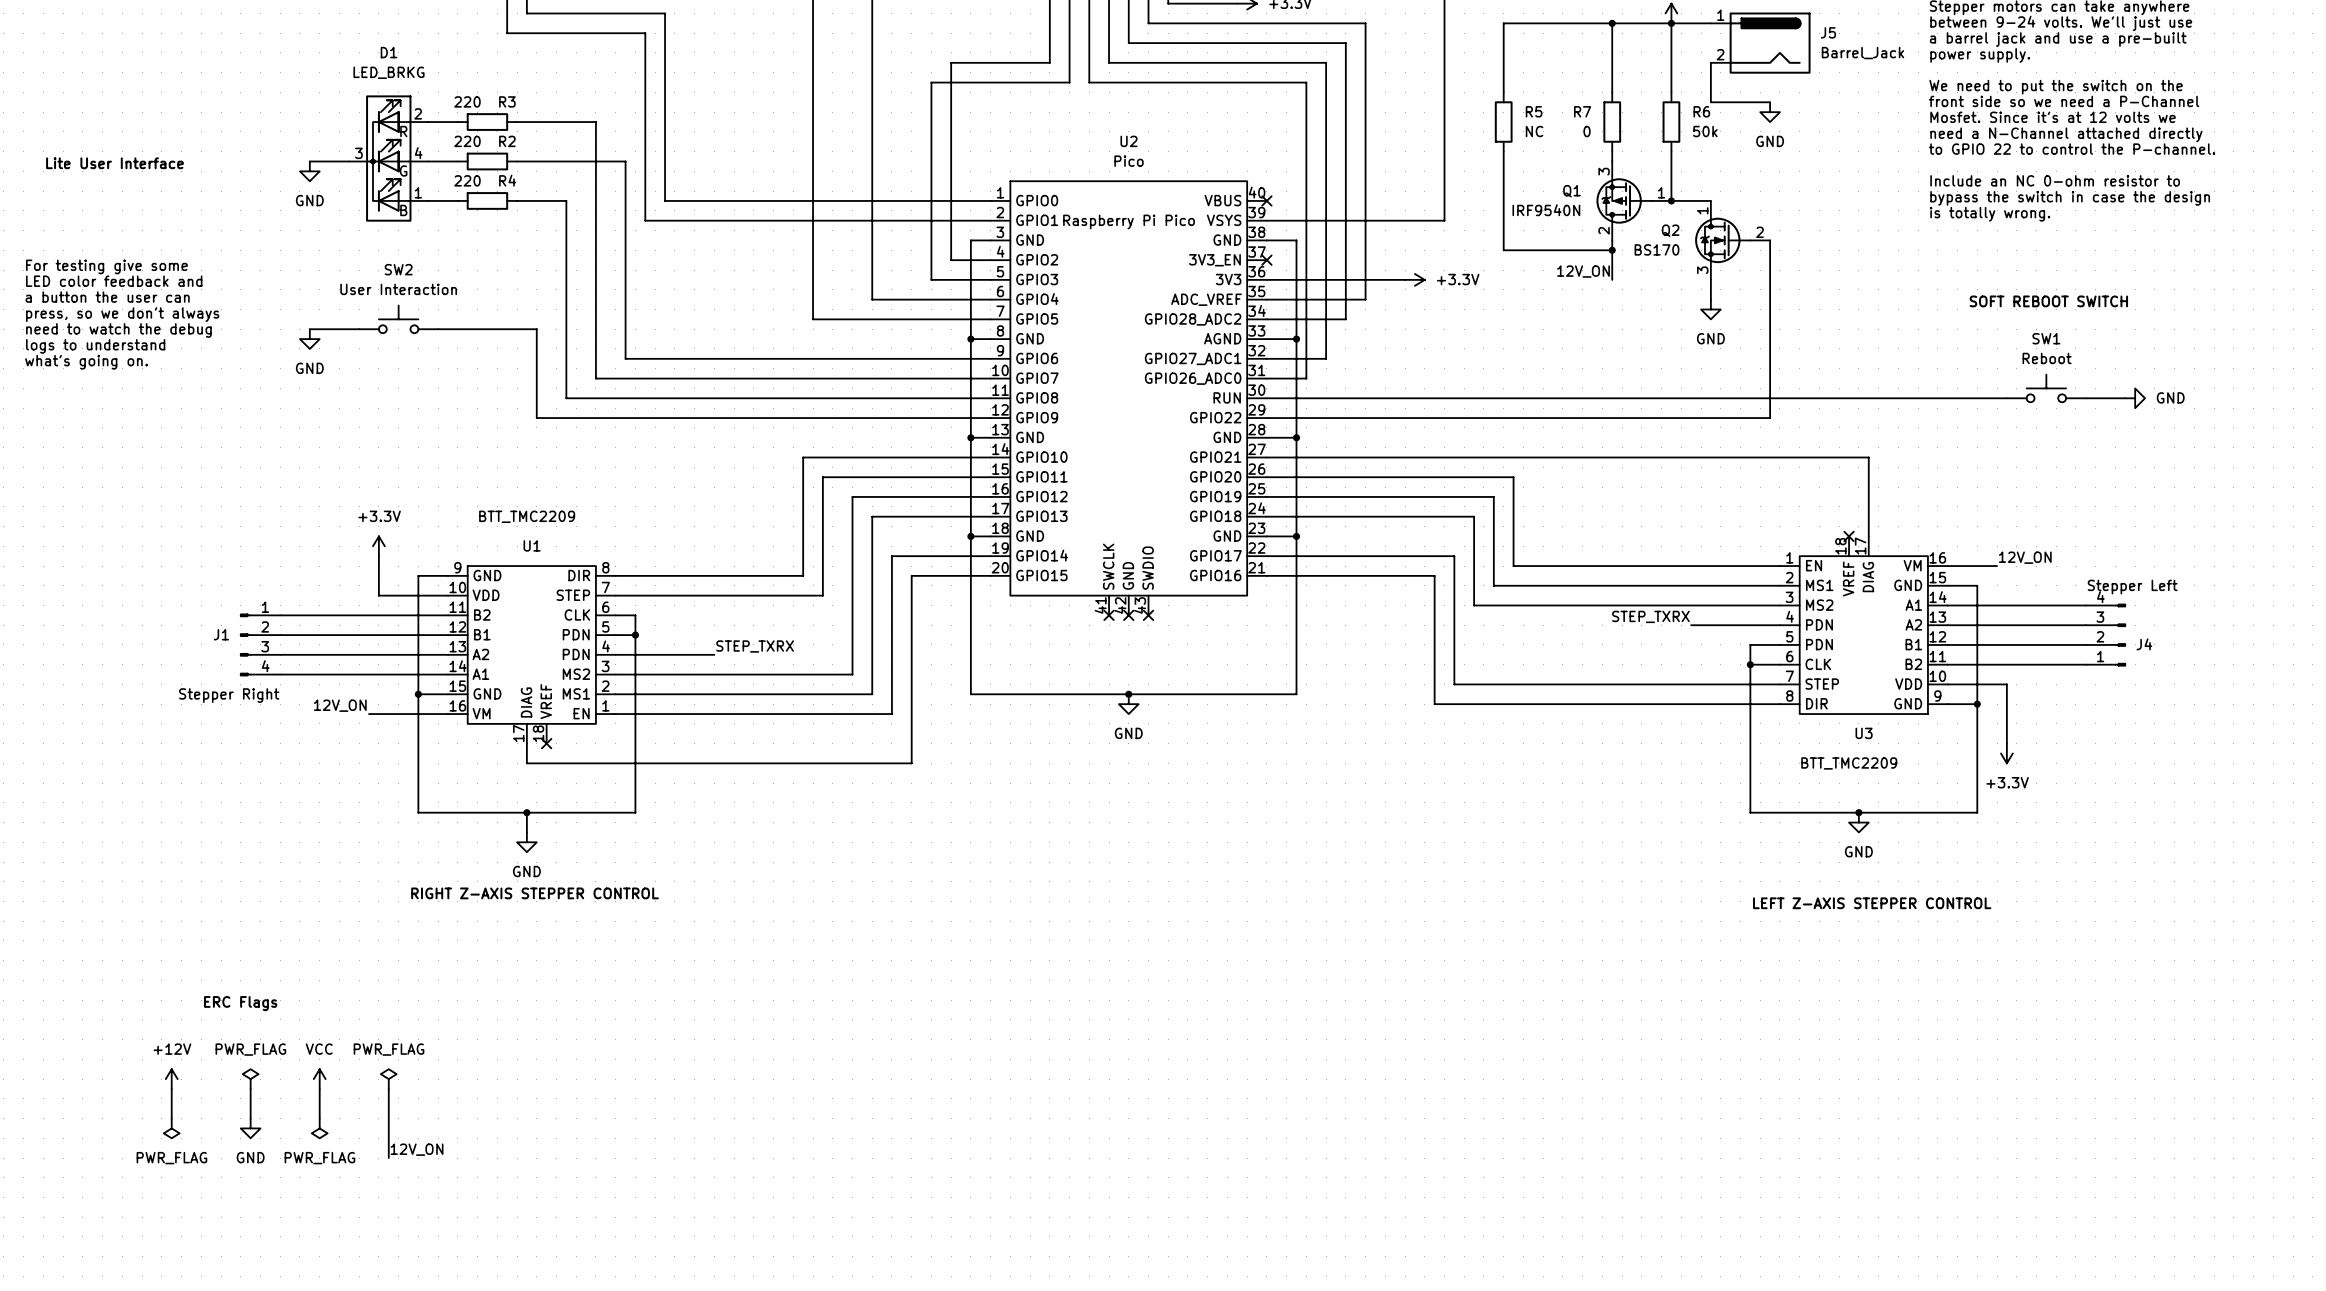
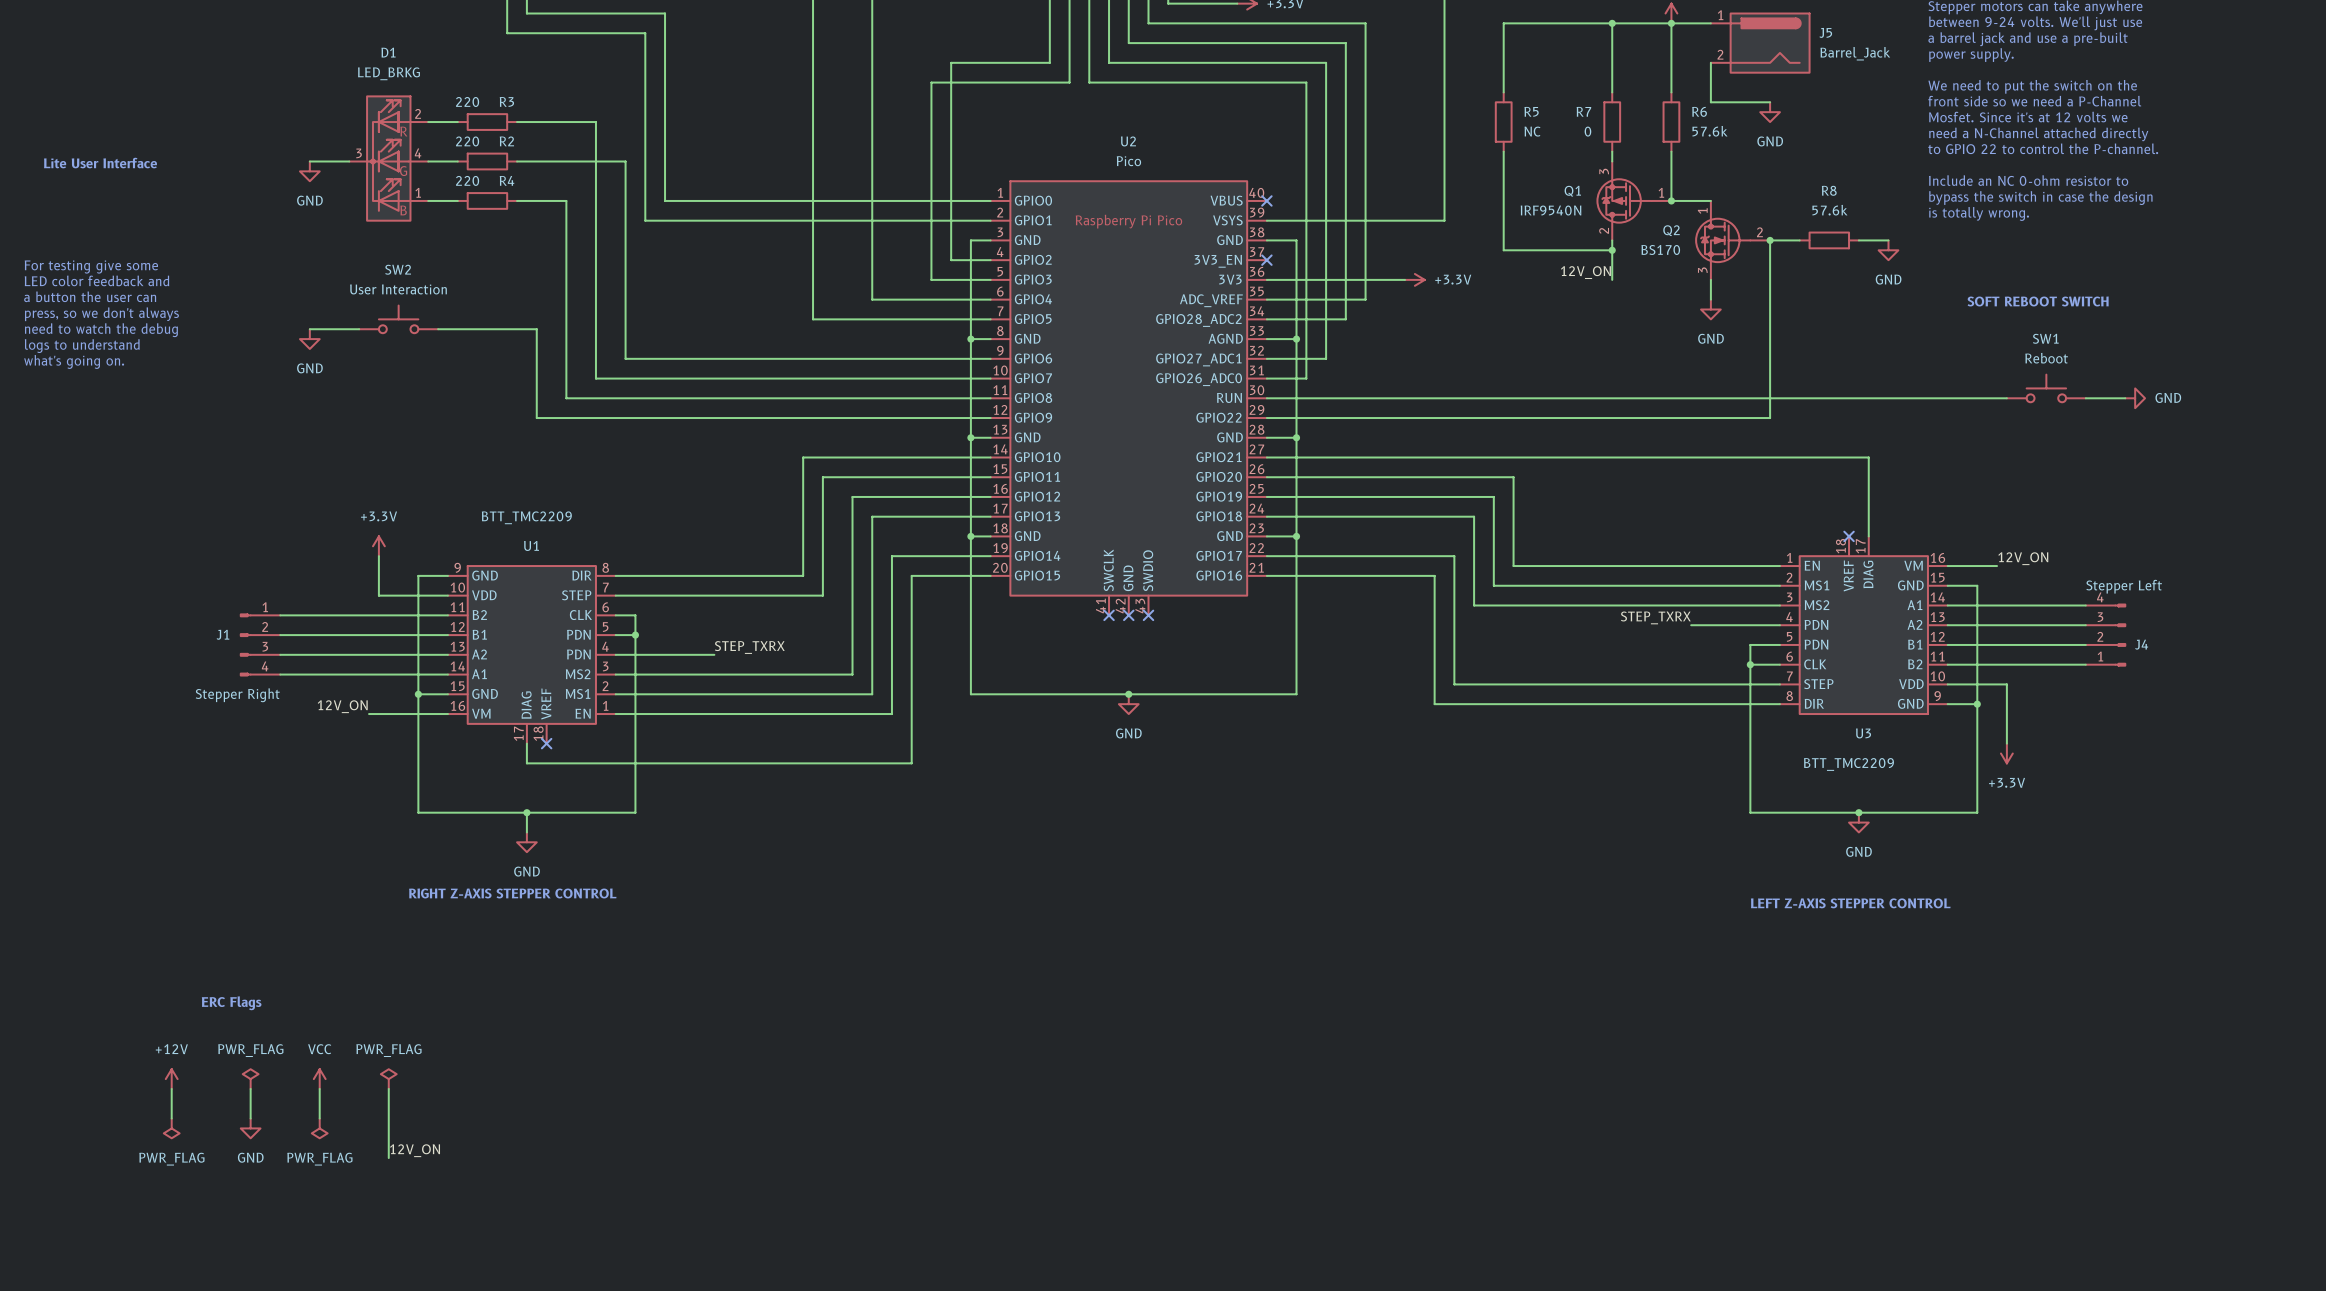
R6 value: 50k (1705, 131) -> 57.6k (1709, 131)
wire: none -> (1770, 240) (1799, 240)
junction: none -> (1770, 240)
R8: none -> 57.6k (1829, 240)
wire: none -> (1858, 240) (1888, 240)
power symbol: none -> GND (1888, 250)

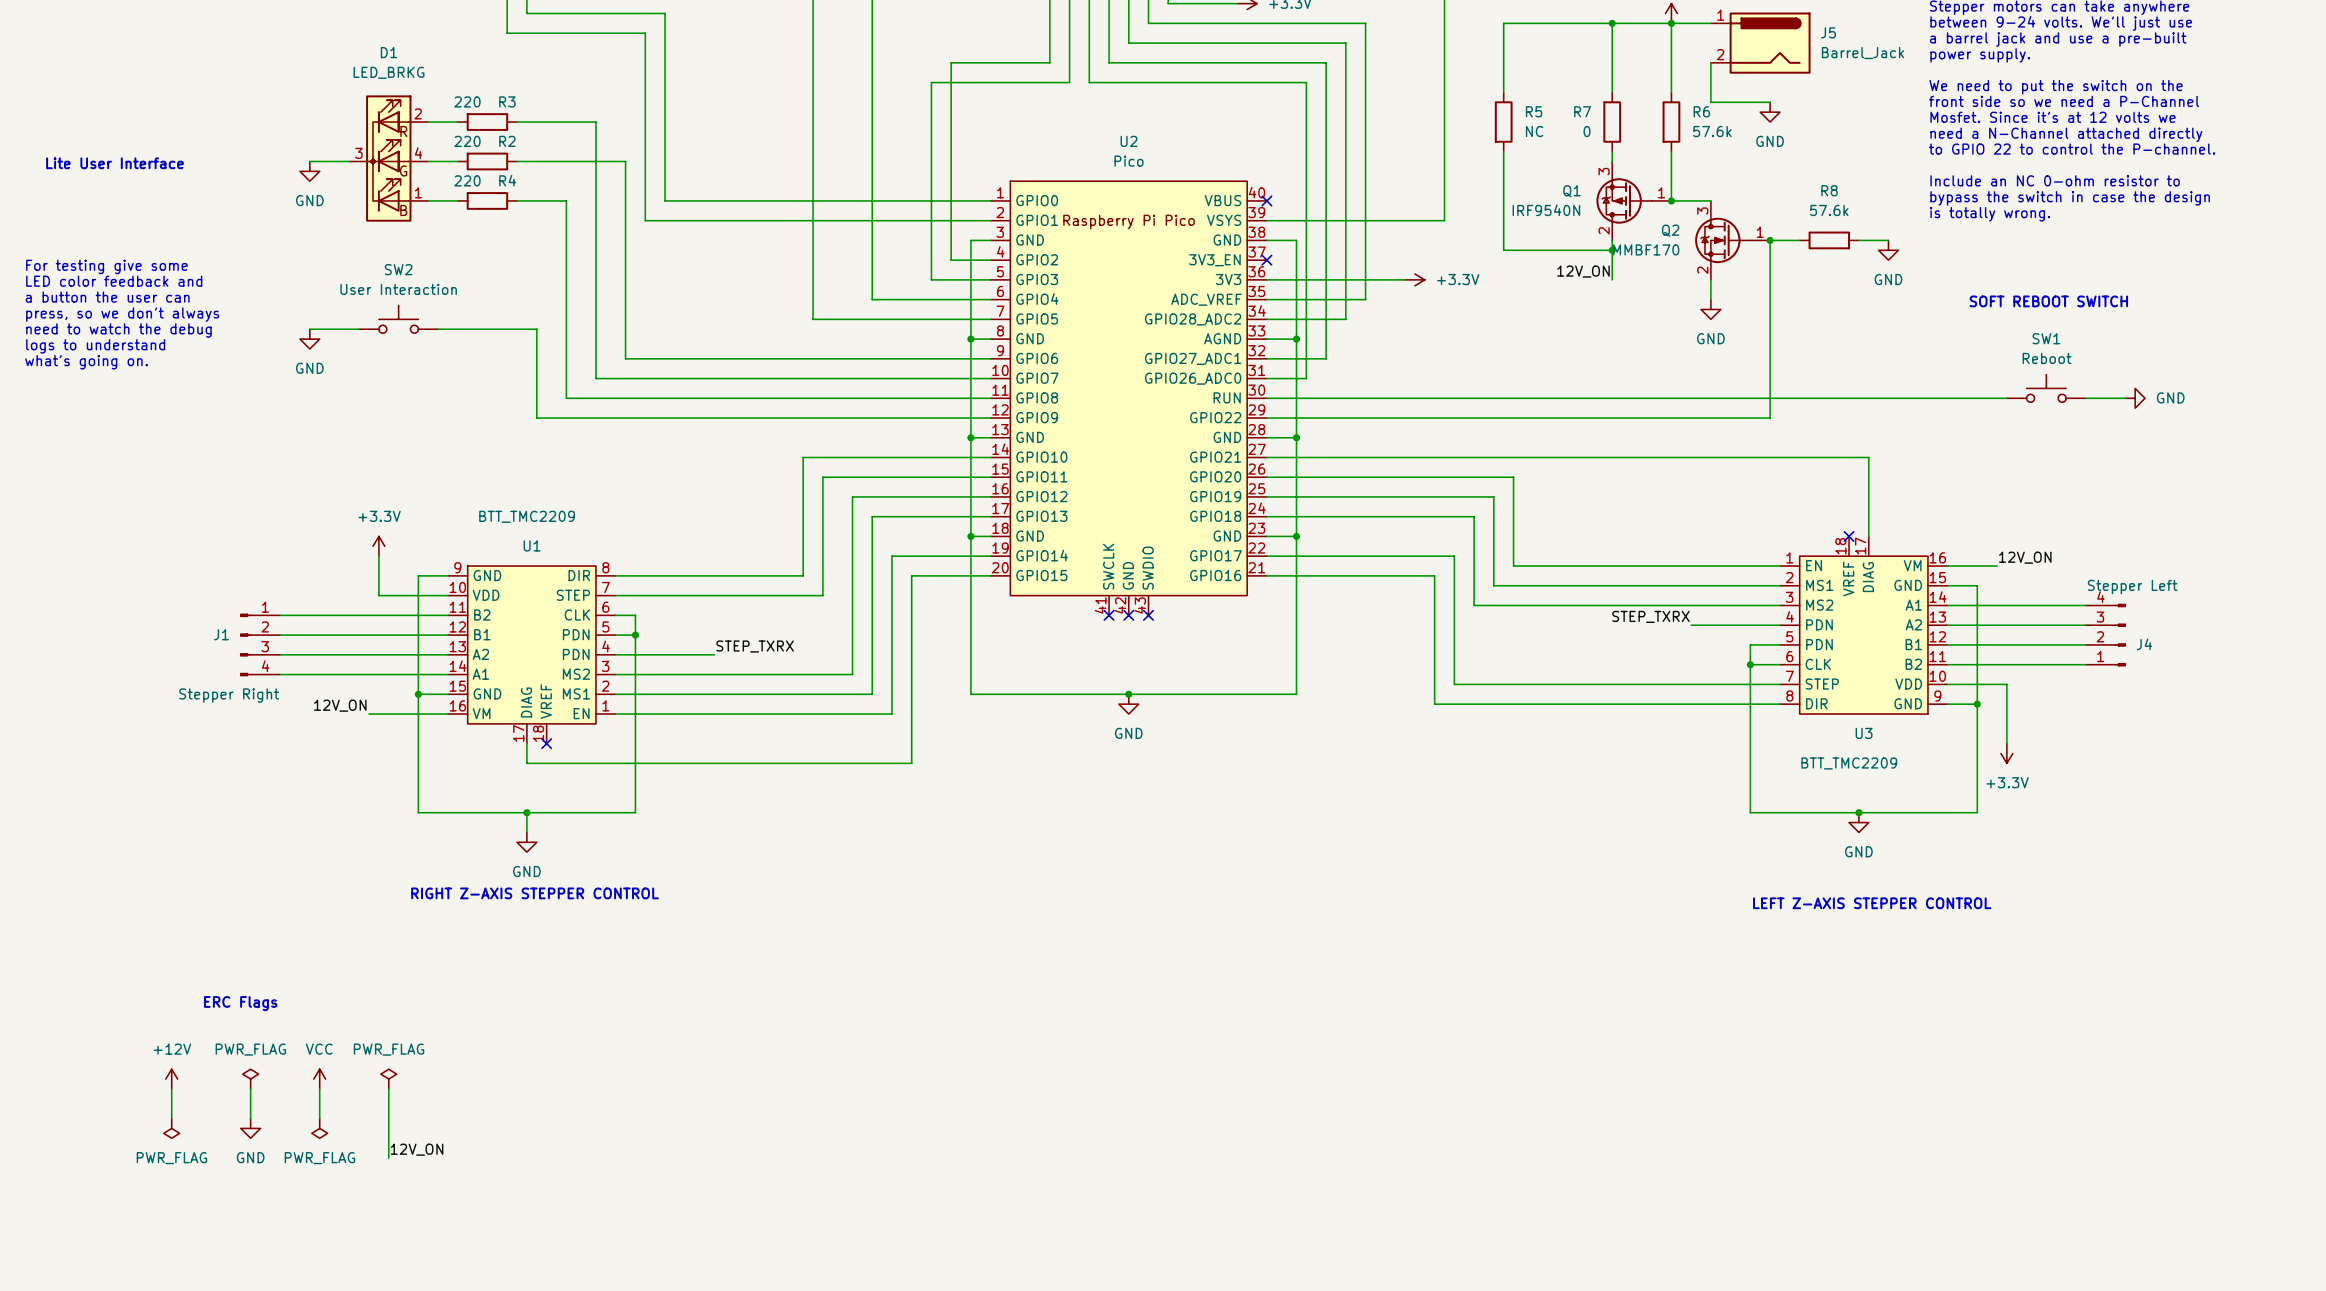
Q2 pin number: 1 (1702, 211) -> 3 (1702, 211)
Q2 pin number: 2 (1759, 232) -> 1 (1760, 232)
Q2 value: BS170 (1660, 249) -> MMBF170 (1646, 249)
Q2 pin number: 3 (1702, 270) -> 2 (1702, 270)

